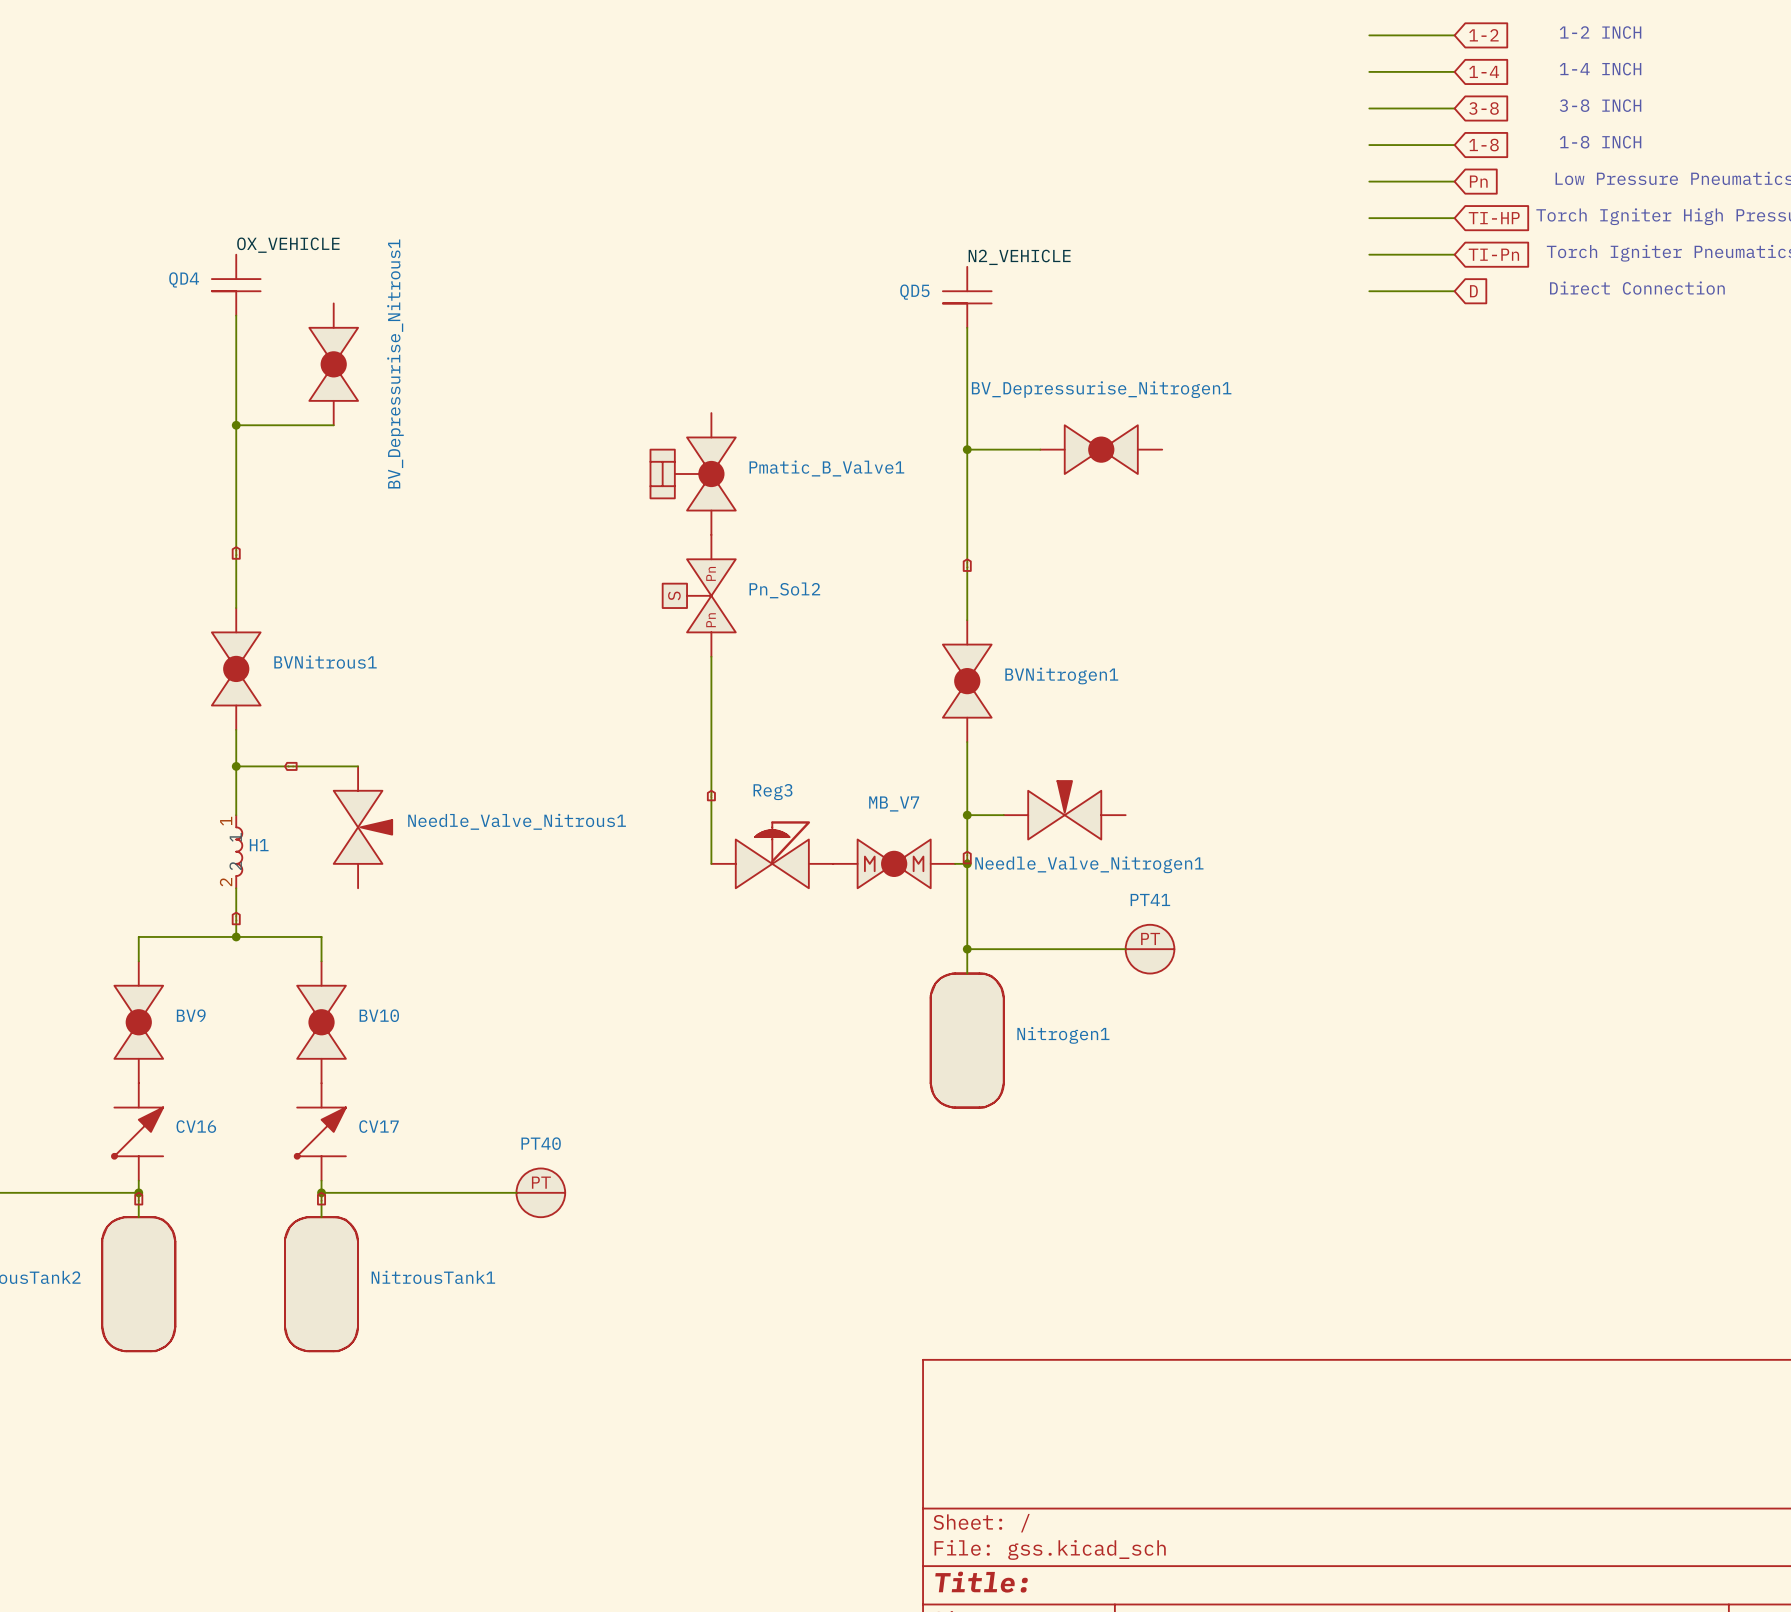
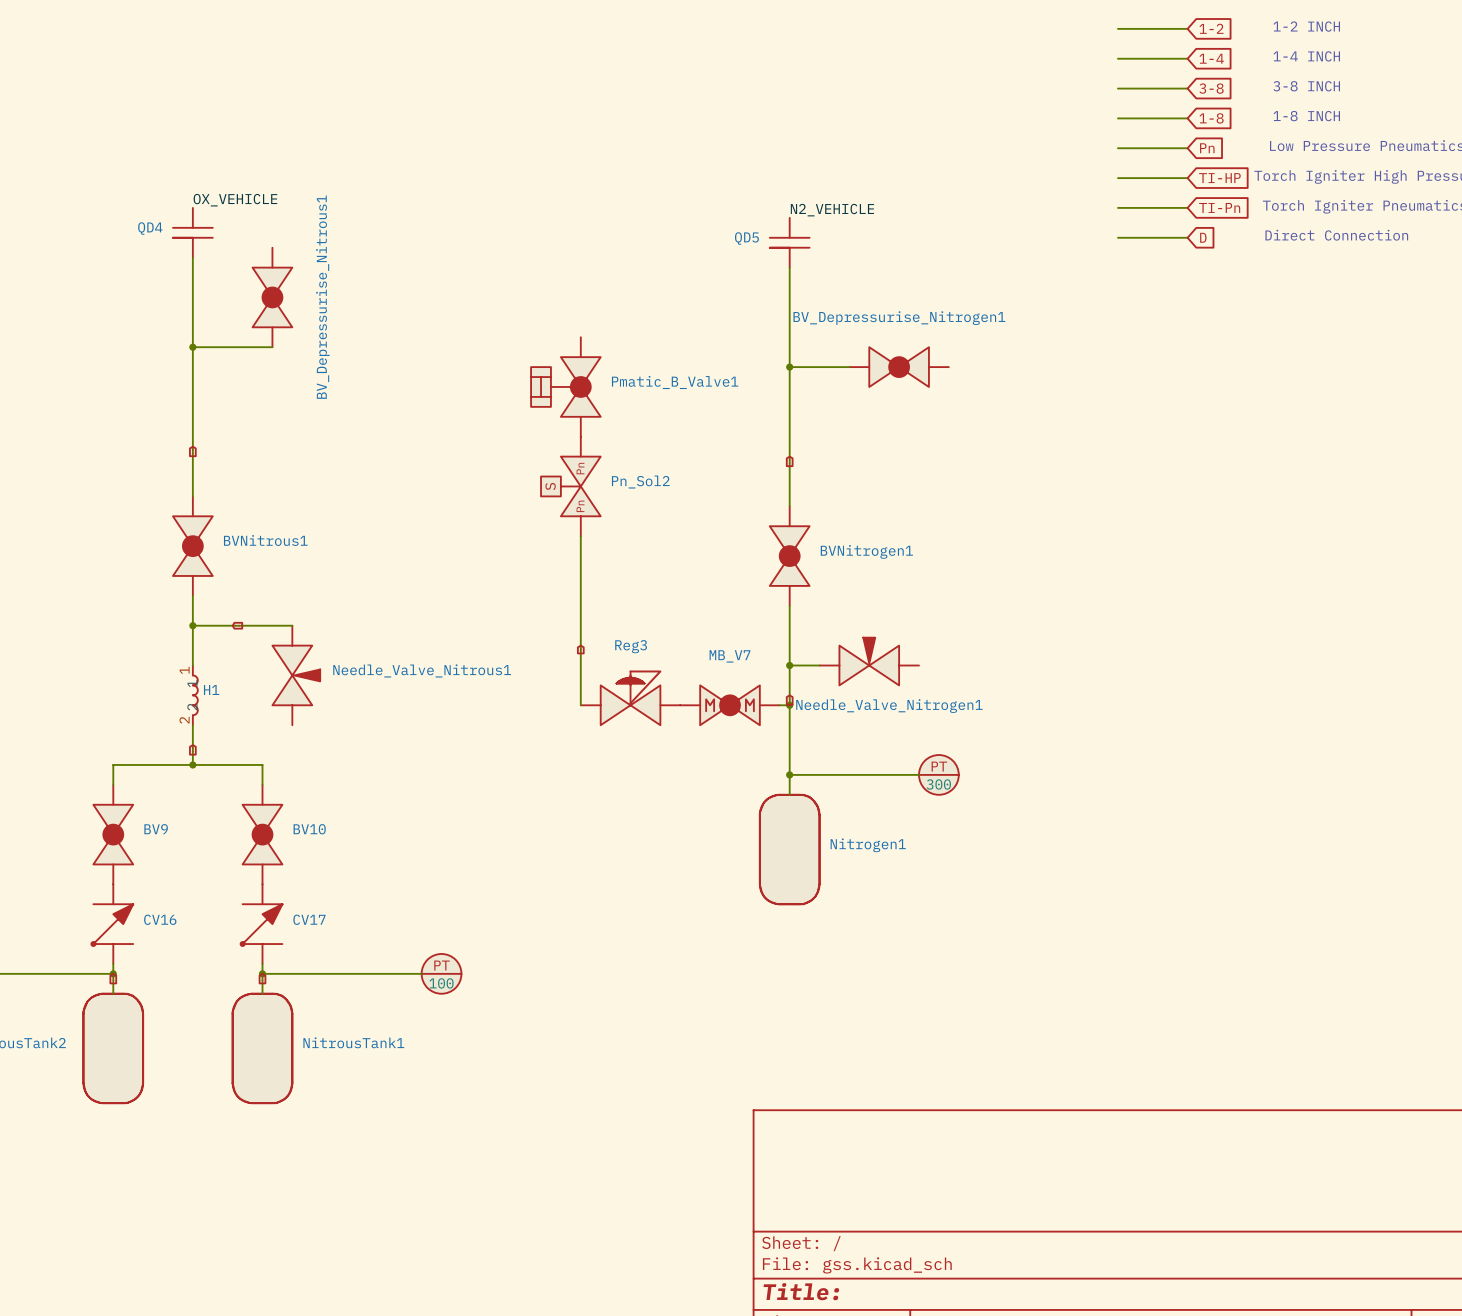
PT41 name: PT41 (1150, 899) -> none
PT41 value: none -> 300 (938, 784)
PT40 name: PT40 (541, 1143) -> none
PT40 value: none -> 100 (441, 983)

